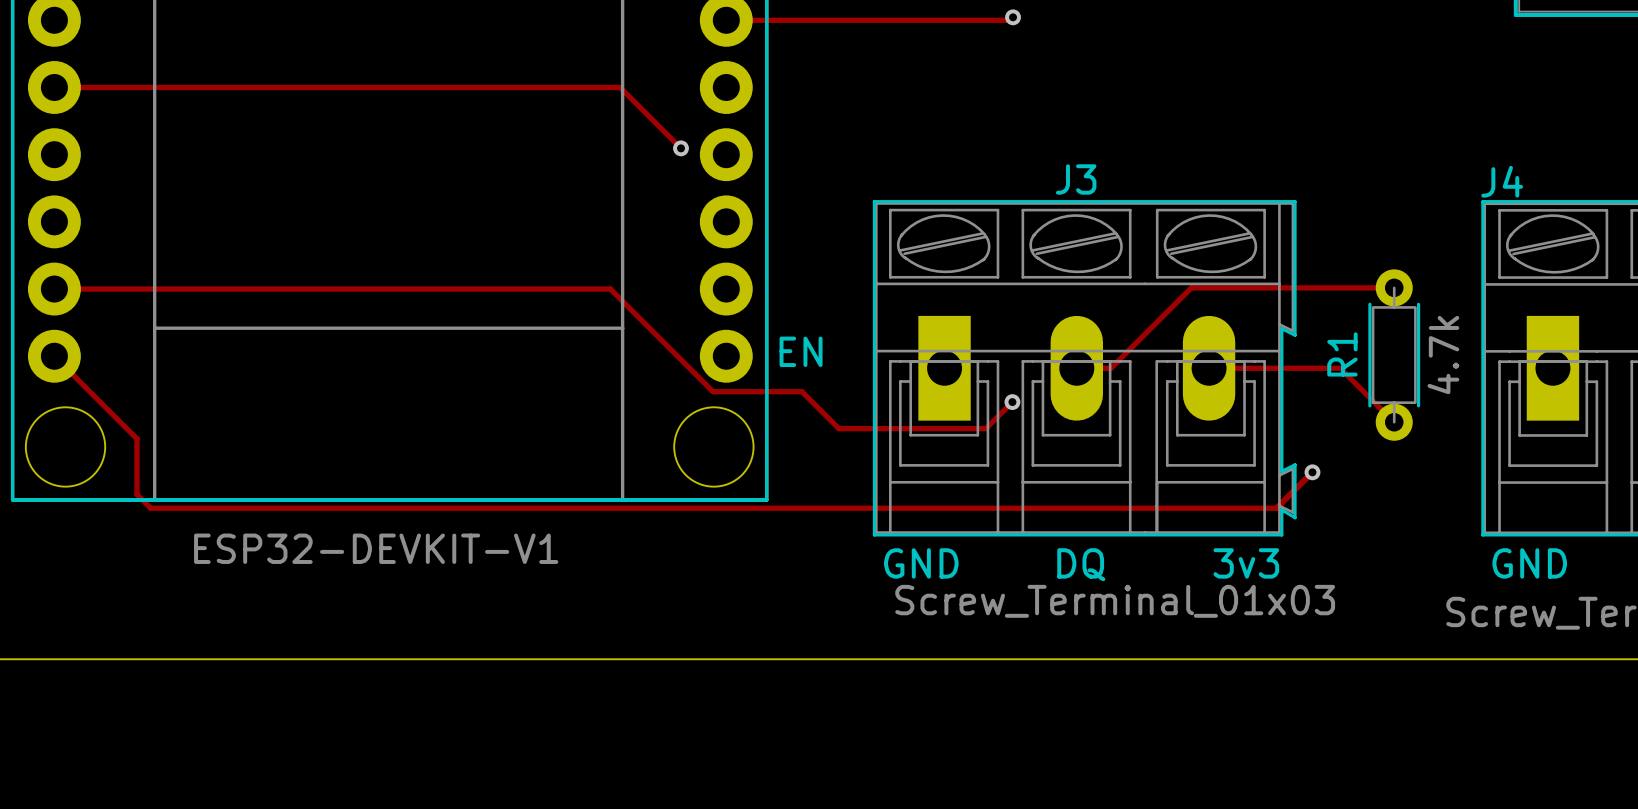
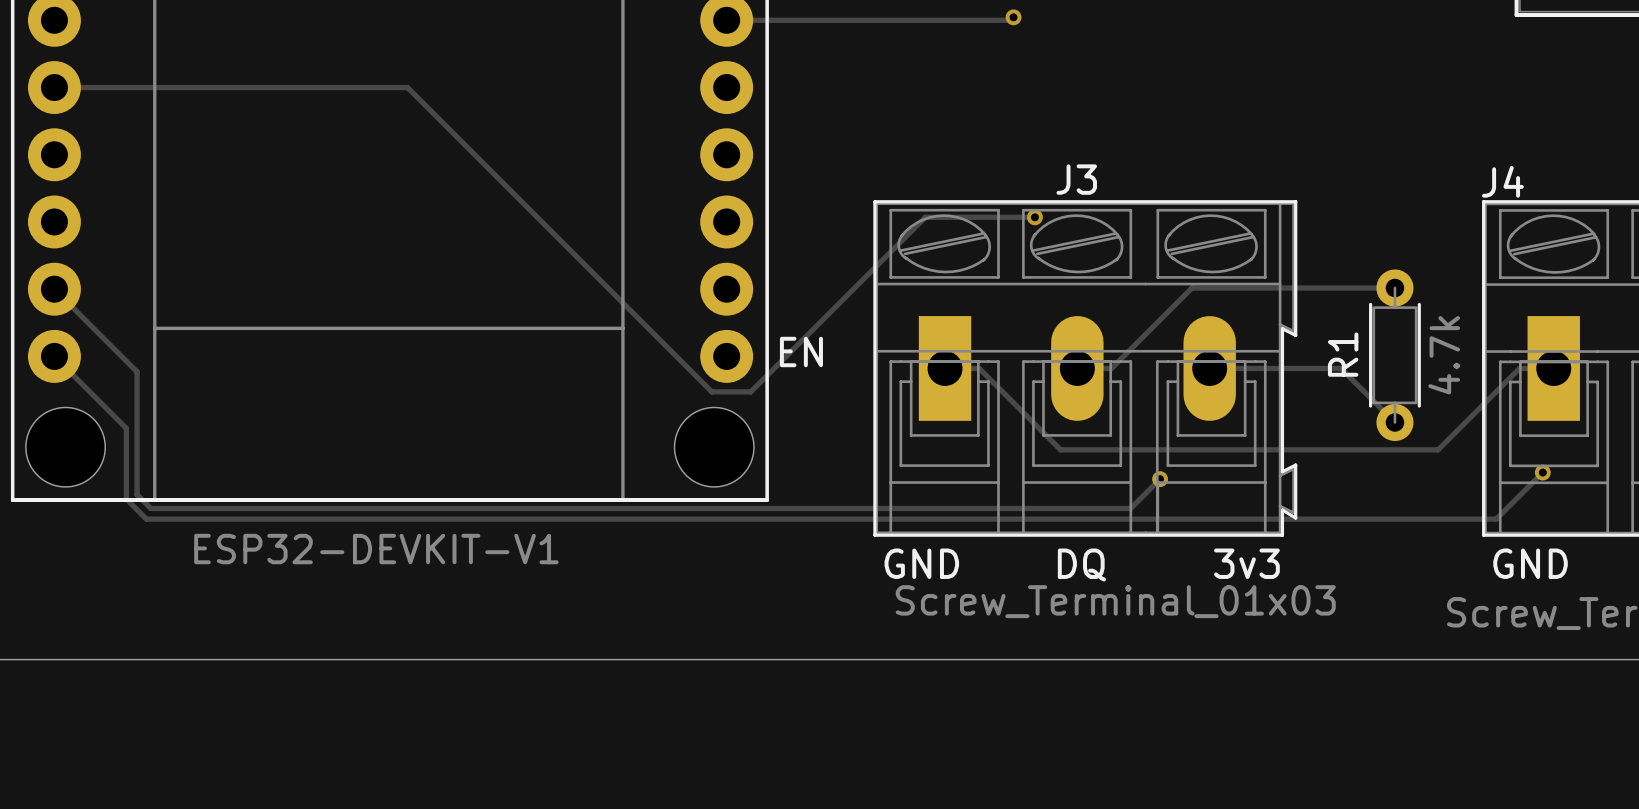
track: (407, 87) (620, 87) (681, 148) -> (407, 87) (711, 391) (750, 391) (925, 217) (1034, 217)
via: (681, 148) -> none
via: none -> (1034, 217)
track: (54, 289) (610, 289) (713, 391) (801, 391) (838, 428) (985, 428) (1012, 402) -> none
track: none -> (945, 368) (979, 368) (1060, 449) (1438, 449) (1519, 368) (1553, 368)
via: (1012, 402) -> none
track: (126, 428) (136, 438) -> (54, 289) (137, 371) (137, 439)
track: none -> (126, 428) (126, 499) (146, 519) (1496, 519) (1542, 472)
track: (1312, 472) (1276, 508) (1130, 508) -> (1160, 479) (1130, 508)
via: (1312, 472) -> none
via: none -> (1542, 472)
via: none -> (1160, 479)

